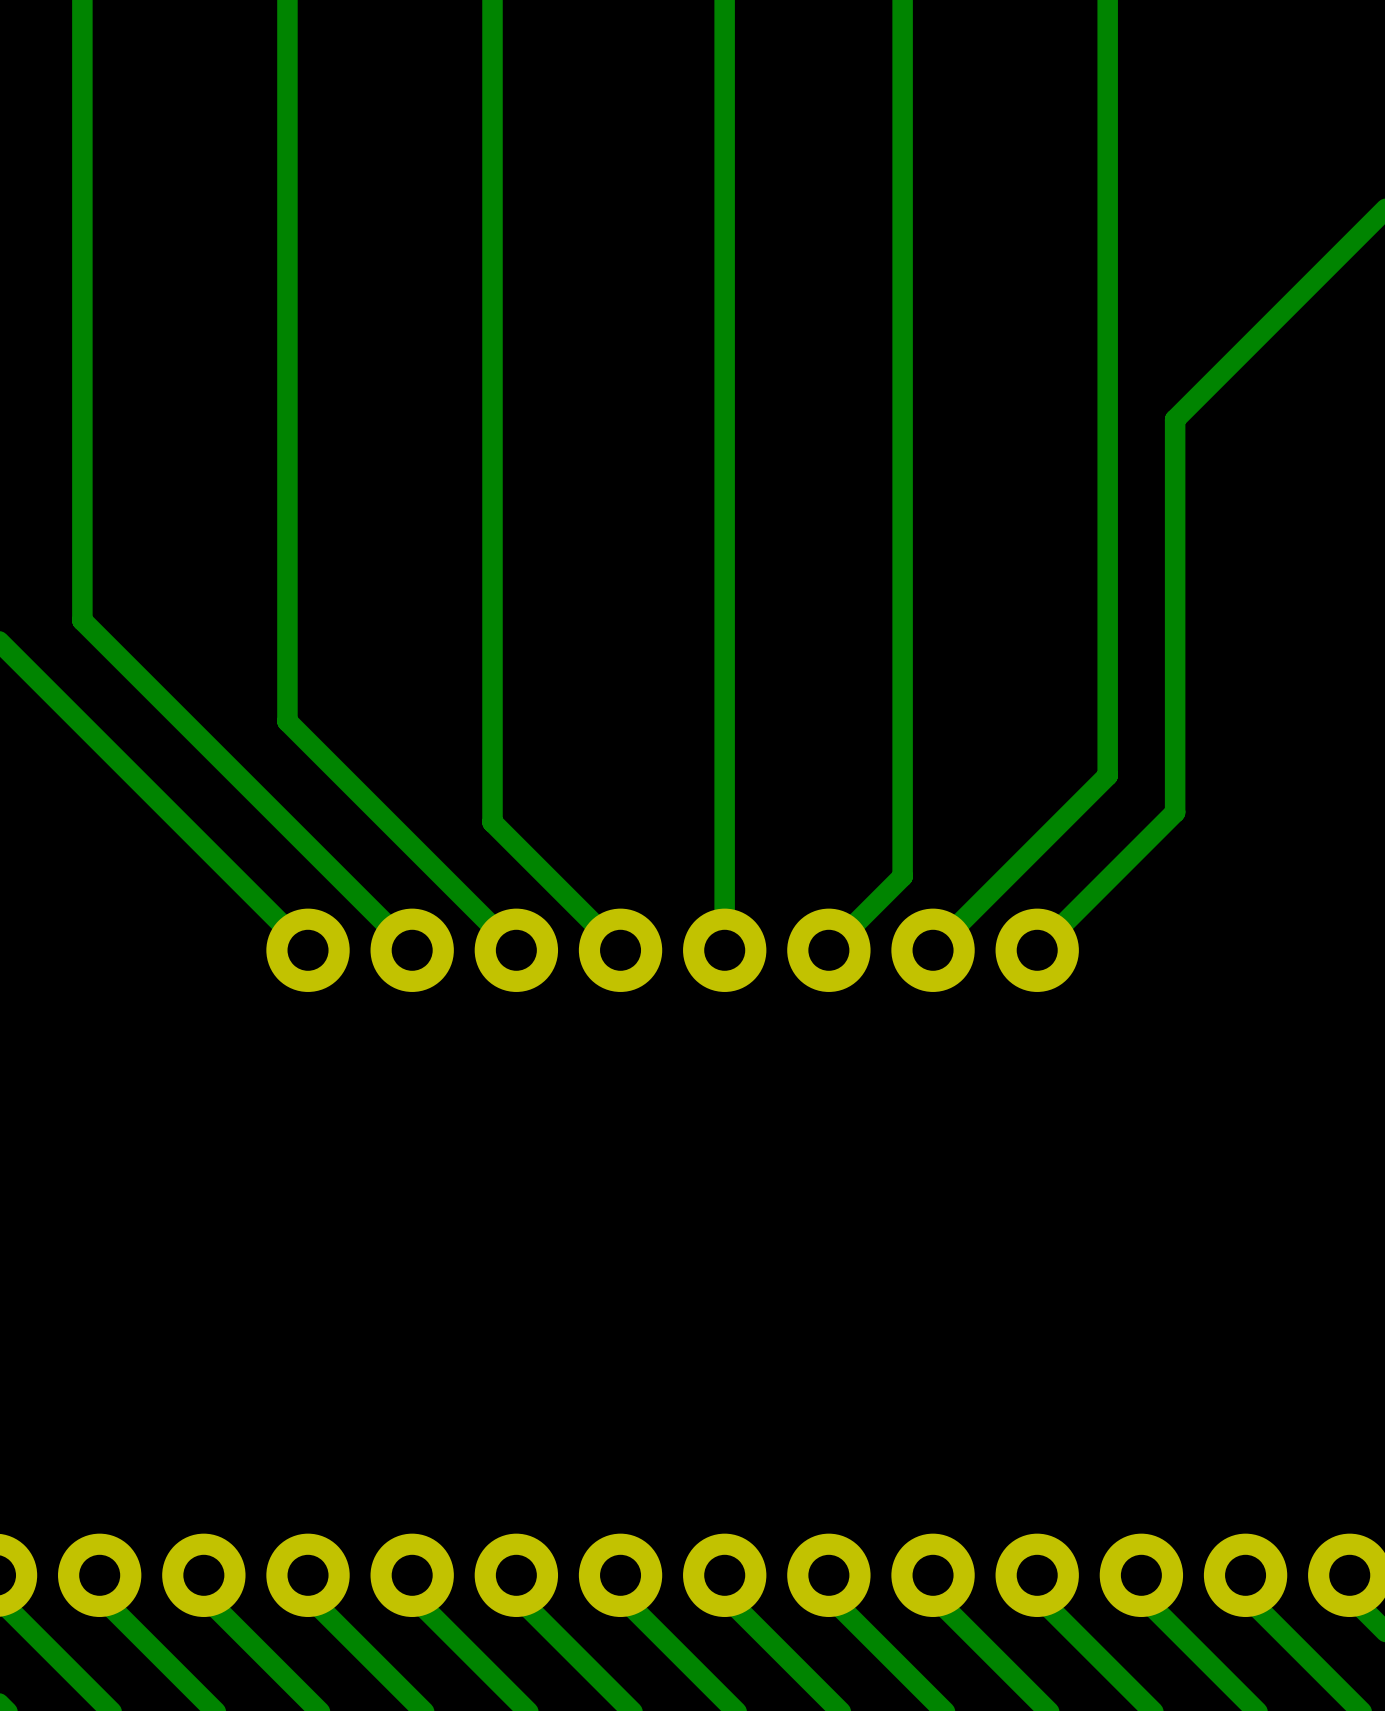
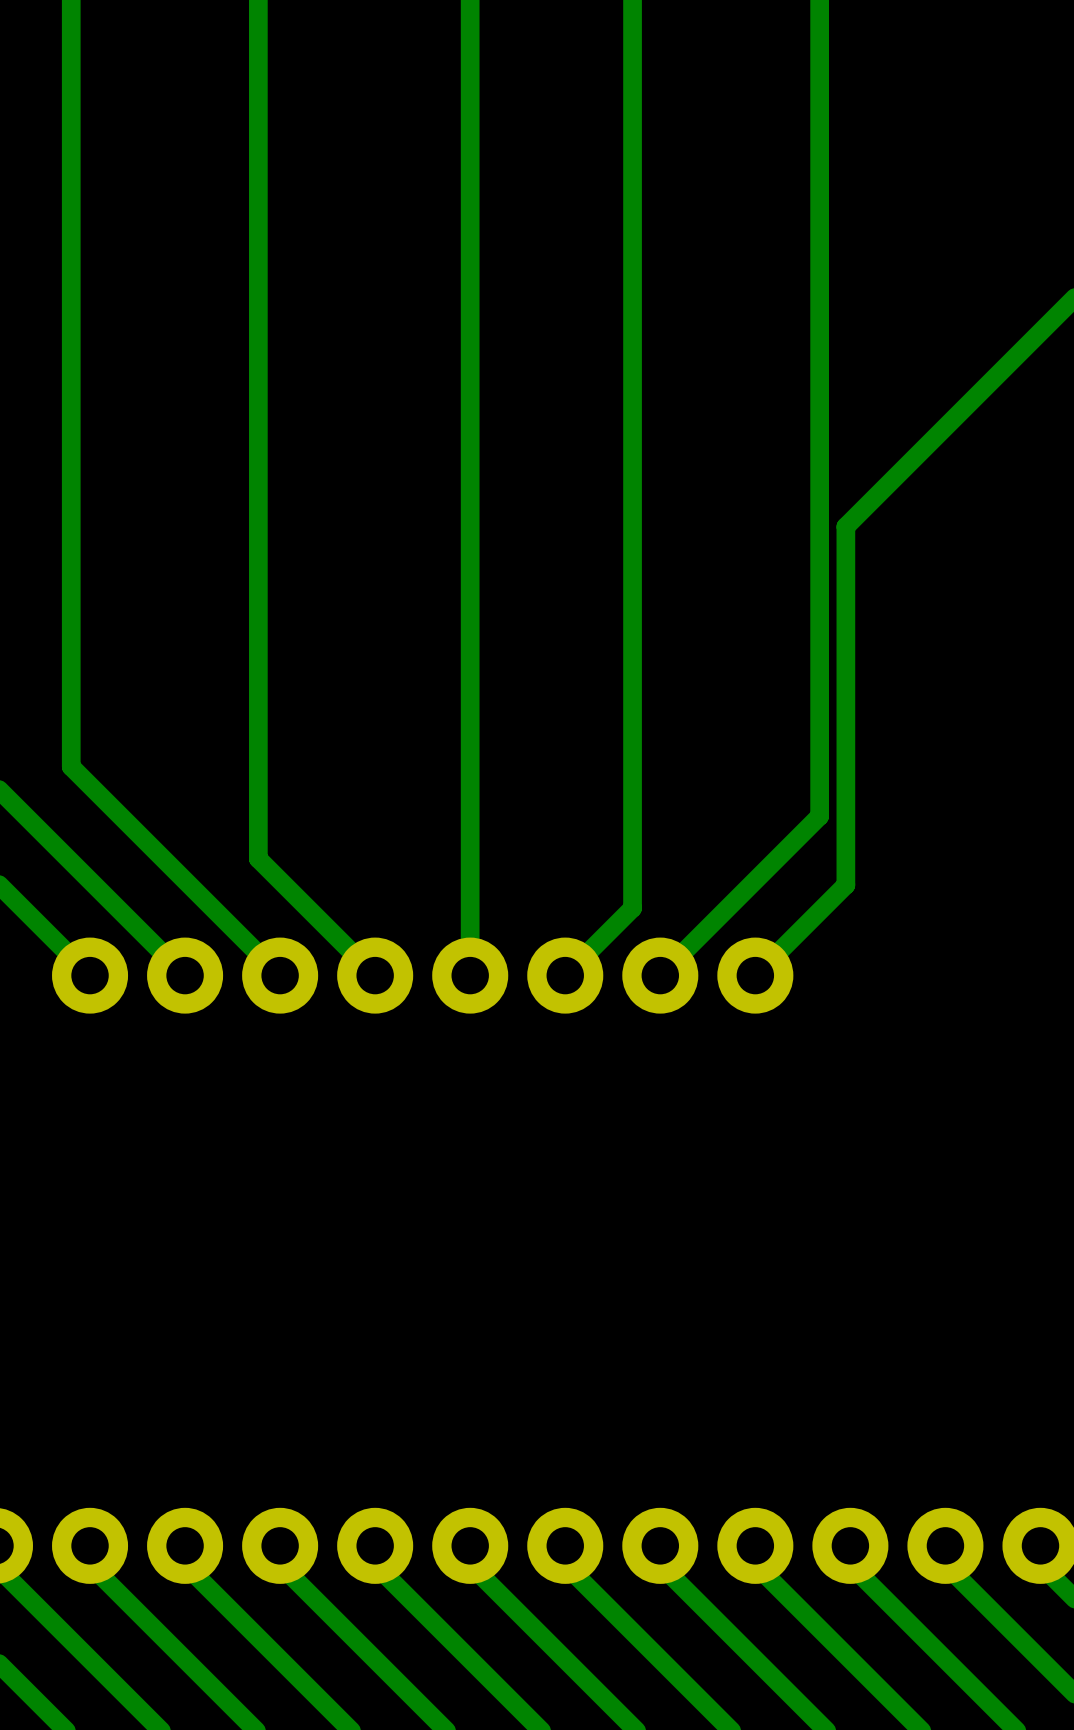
track: (1175, 419) (1175, 812) (1136, 851) -> (881, 491) (845, 526) (845, 885)

